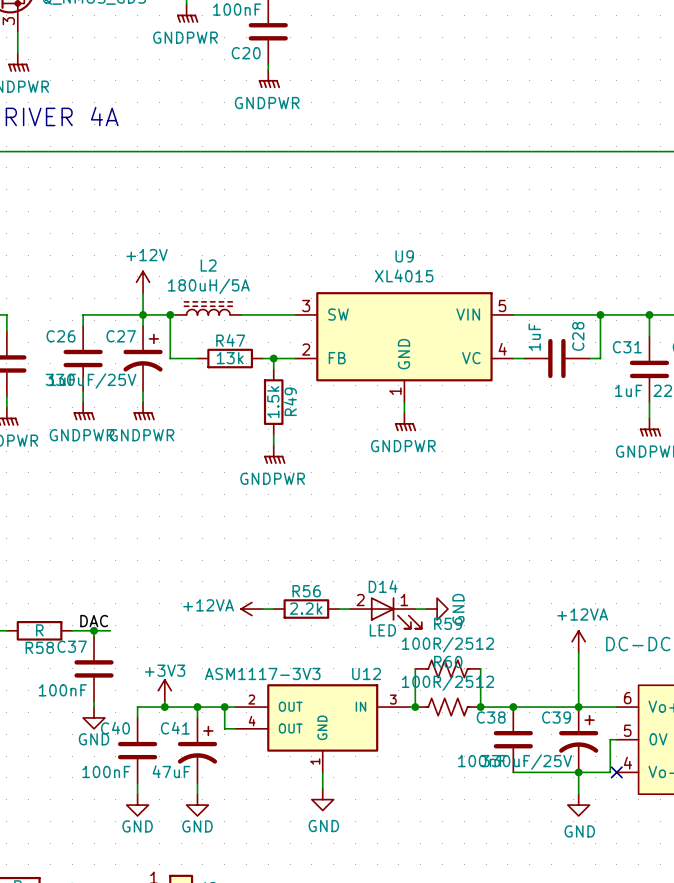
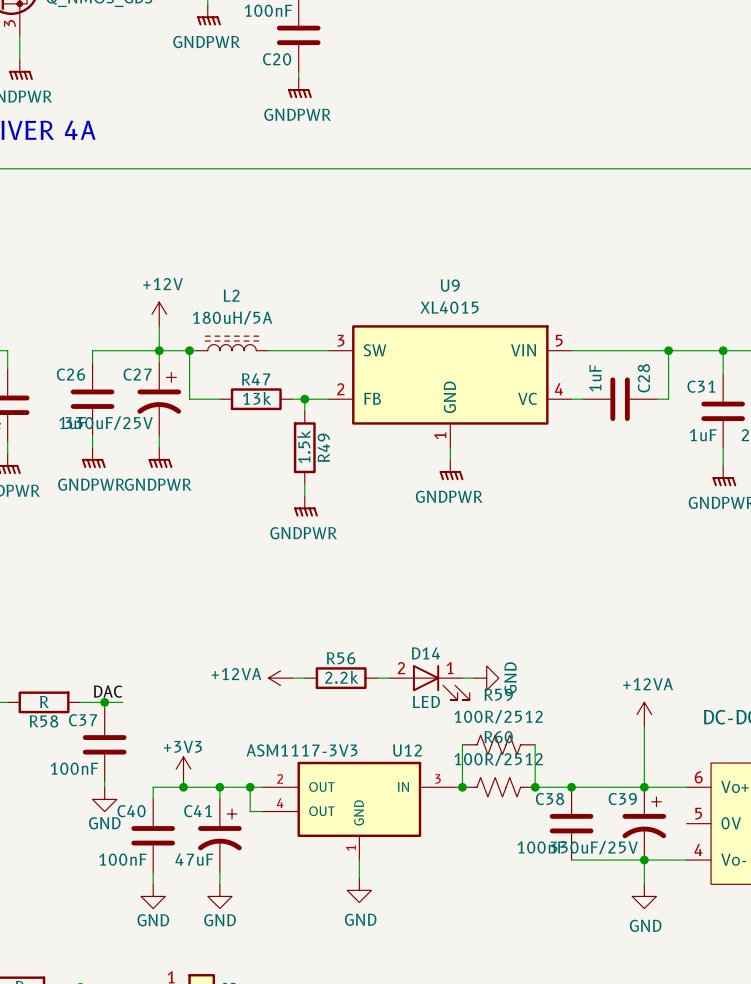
wire: (616, 739) (610, 739) (610, 772) -> (686, 860) (679, 860)
no-connect mark: (616, 772) -> none

